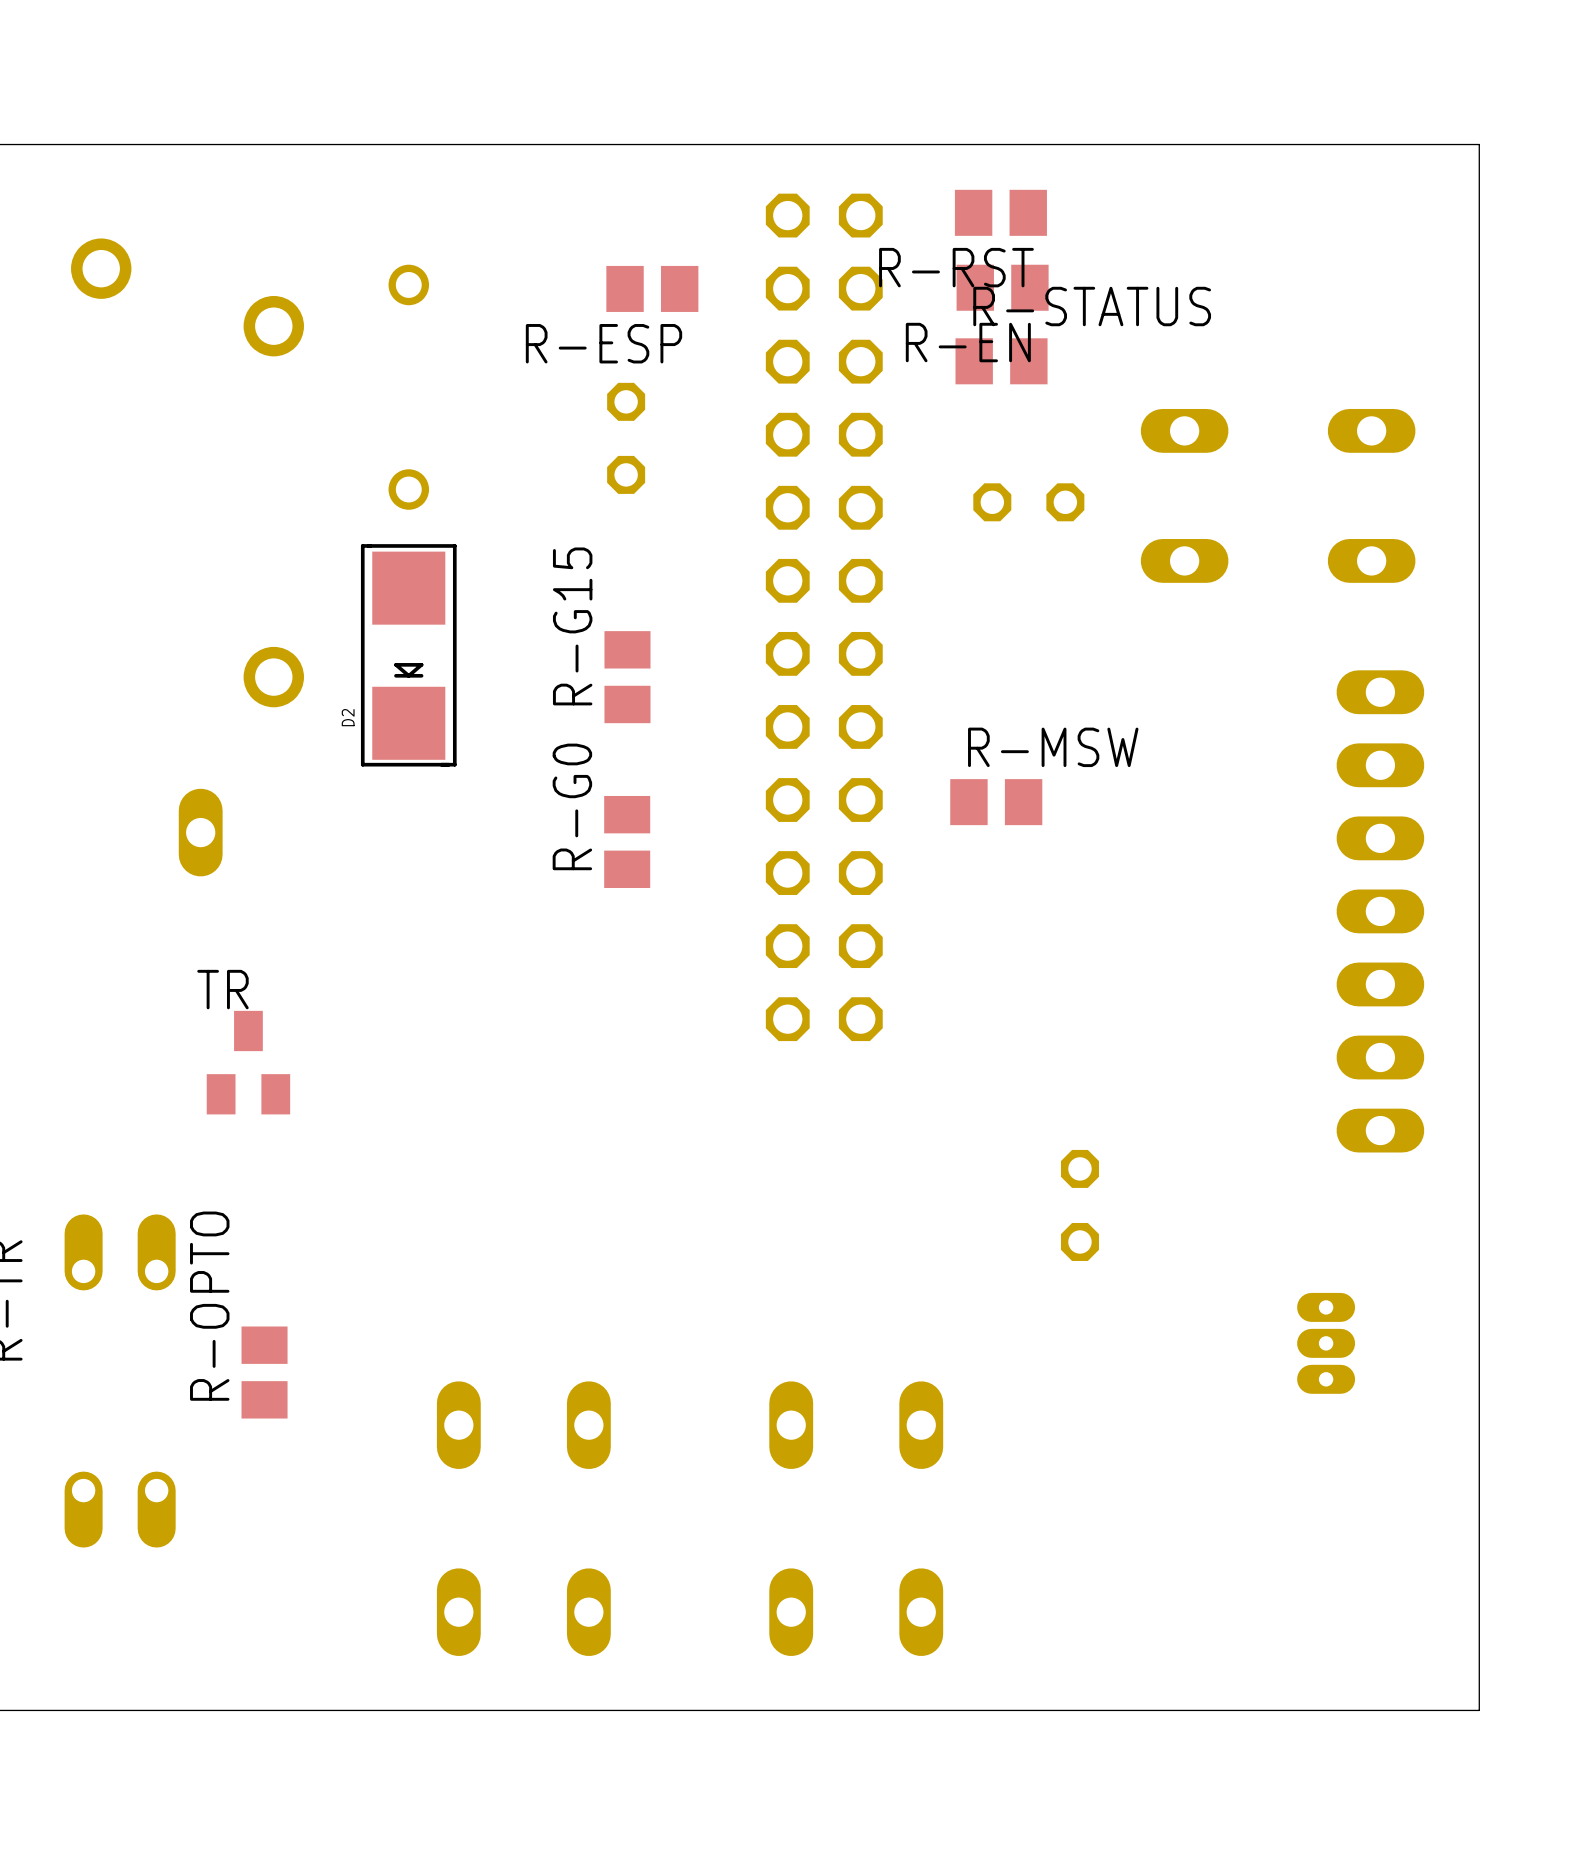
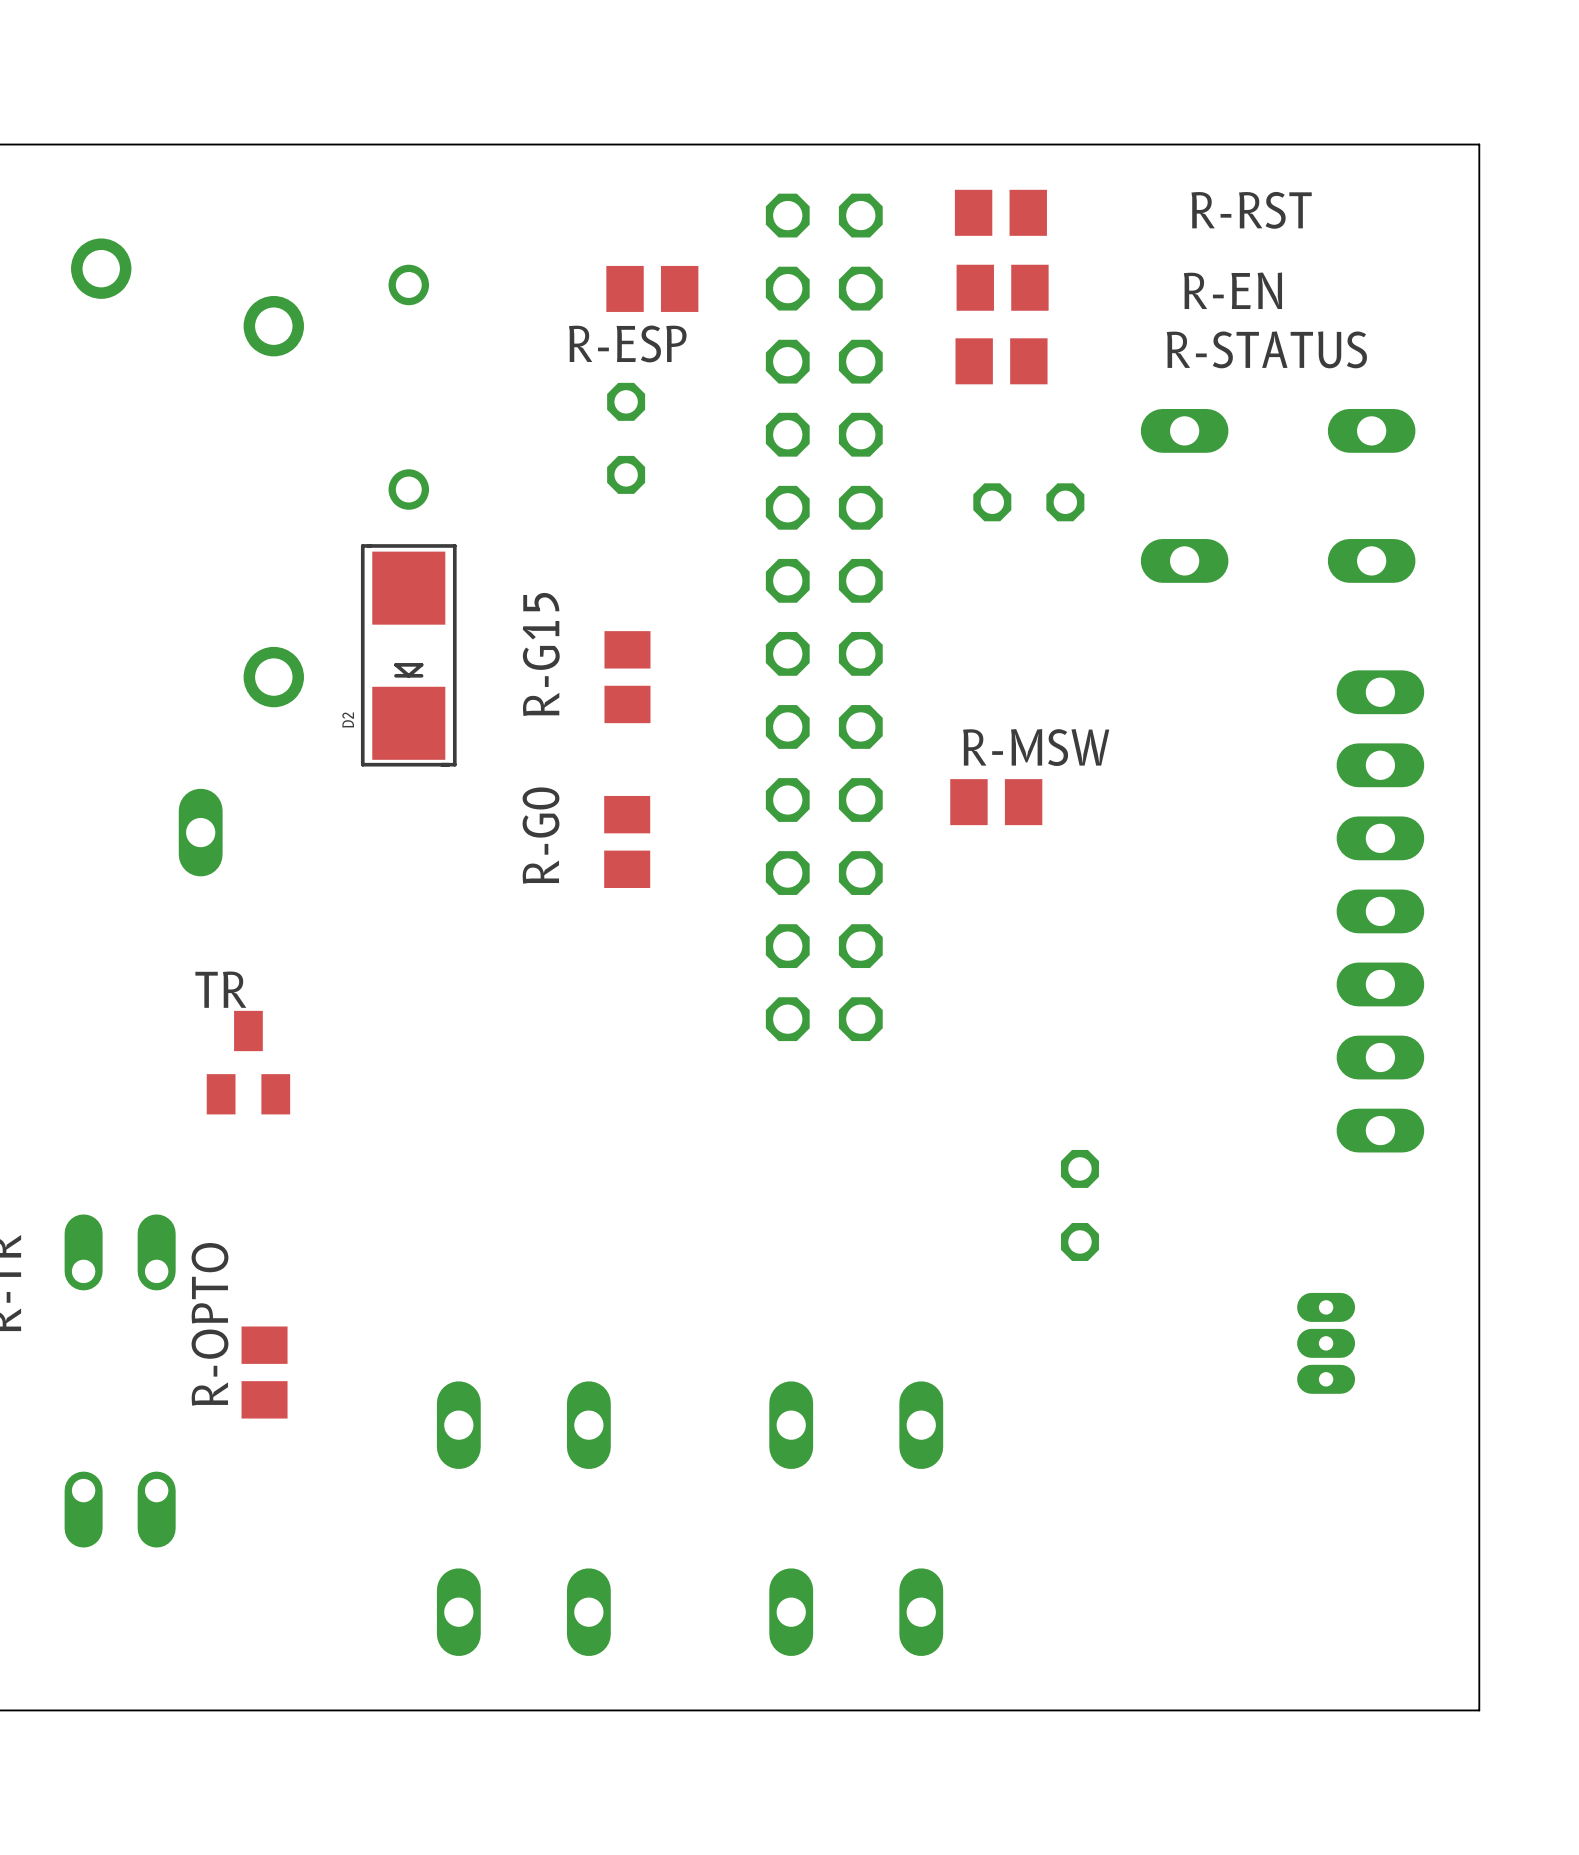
R-RST name position: R-RST (956, 267) -> R-RST (1251, 210)
R-STATUS name position: R-STATUS (1092, 306) -> R-STATUS (1266, 349)
R-EN name position: R-EN (968, 342) -> R-EN (1232, 290)
R-G15 name position: R-G15 (572, 626) -> R-G15 (541, 654)
R-G0 name position: R-G0 (572, 806) -> R-G0 (541, 835)

